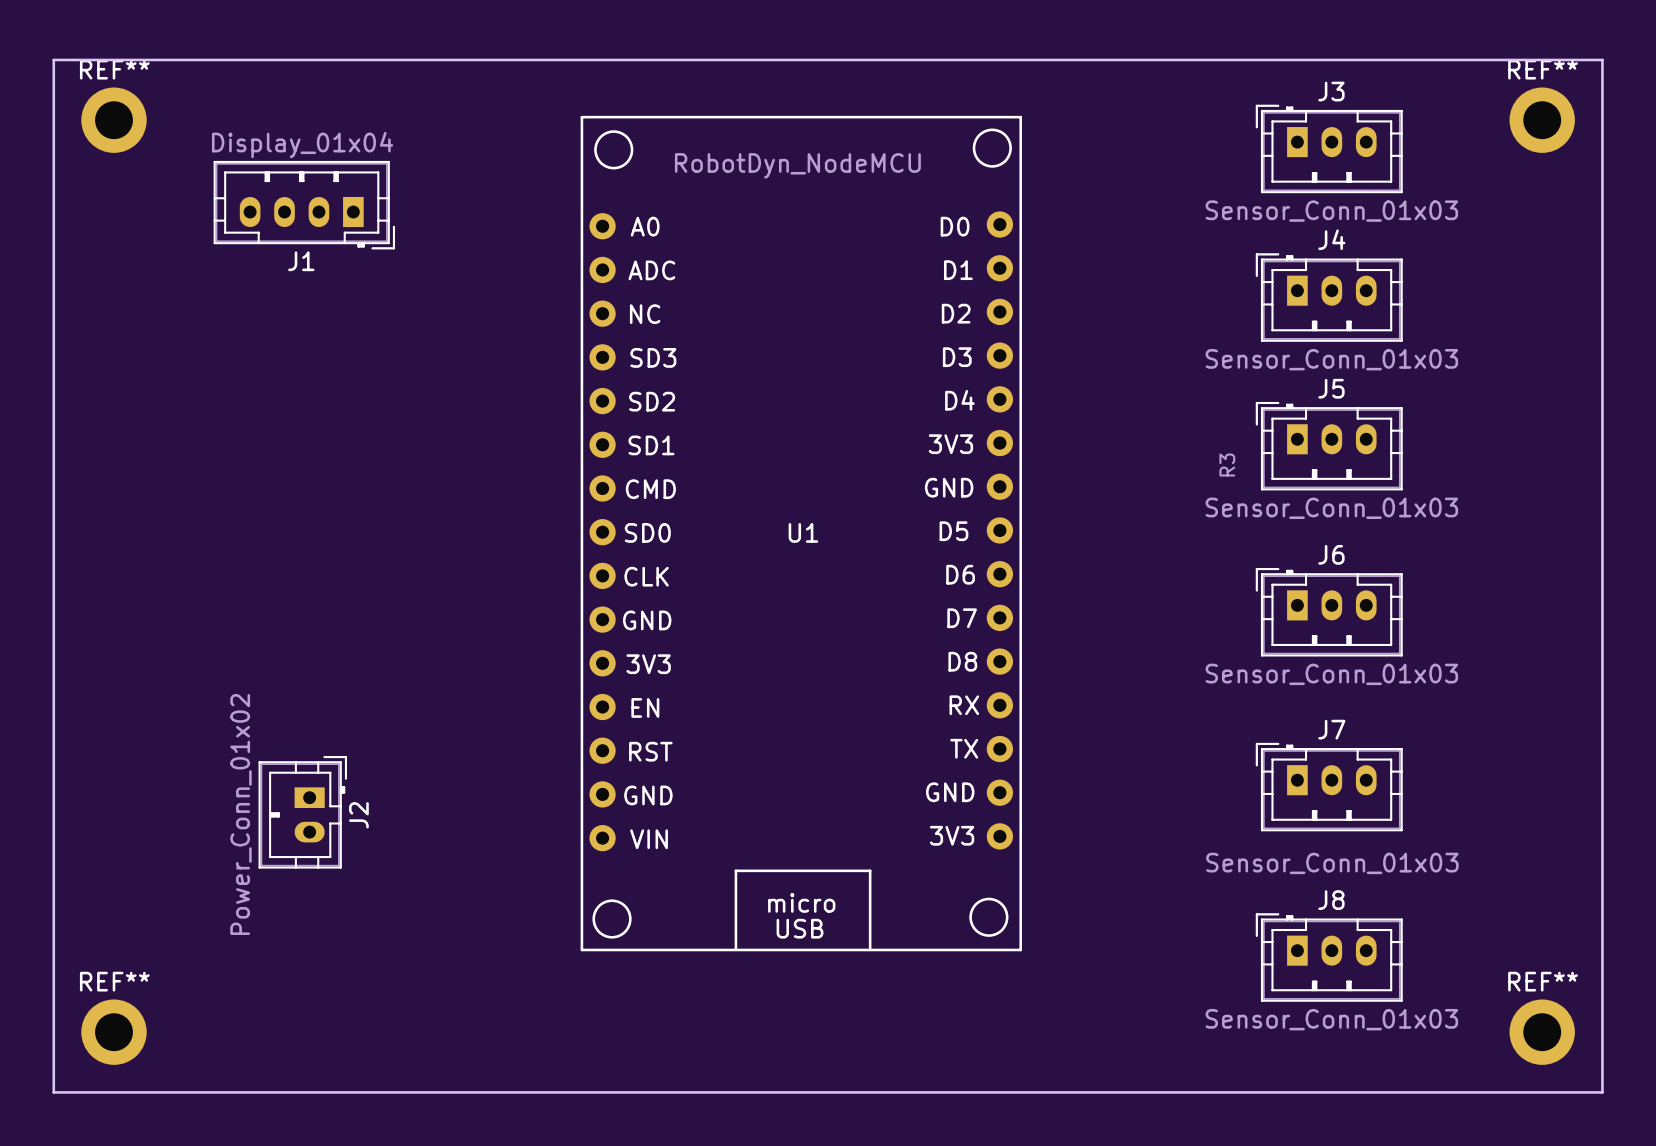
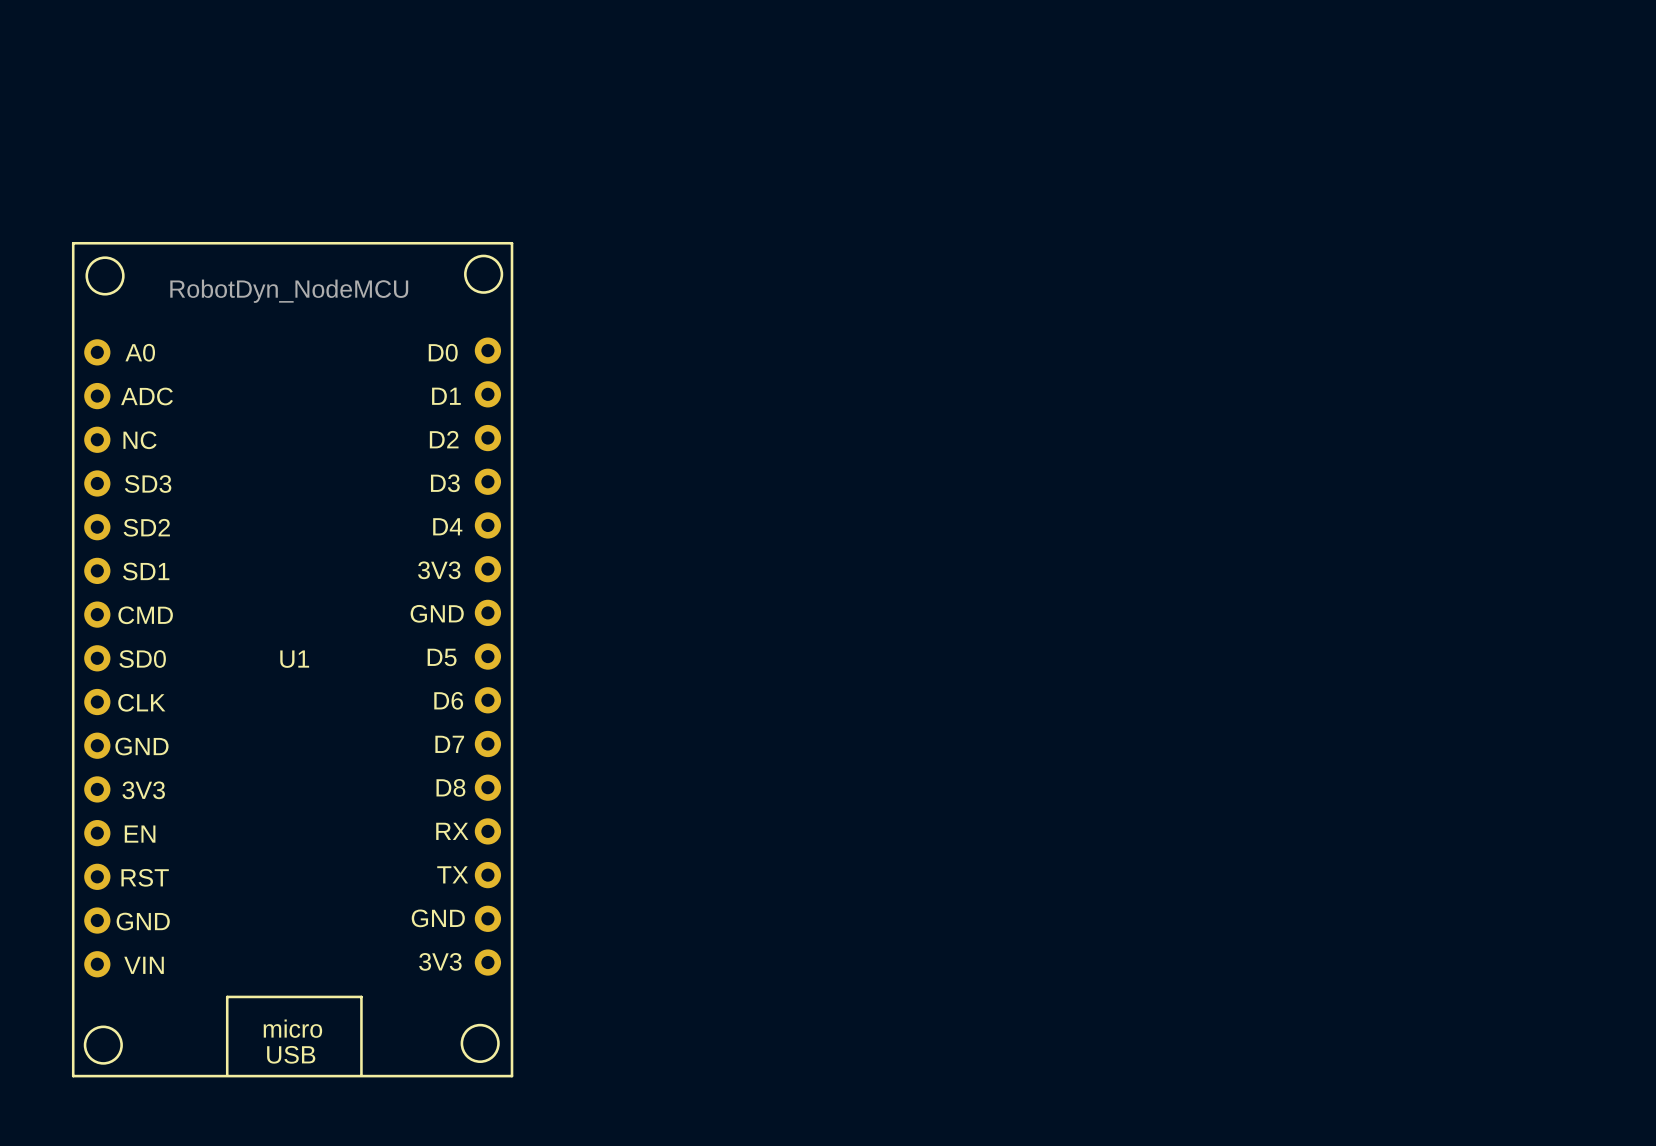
board edge: (53, 59) (53, 1092) (1602, 1092) (1602, 59) (53, 59) -> none
U1 footprint: [580, 115, 1023, 952] -> [71, 241, 514, 1078]
REF**: (114, 120) -> none
REF**: (1542, 120) -> none
J3: Sensor_Conn_01x03 (1329, 148) -> none
J1: Display_01x04 (304, 205) -> none
J4: Sensor_Conn_01x03 (1329, 297) -> none
J5: Sensor_Conn_01x03 (1329, 446) -> none
R3: (1227, 465) -> none
J6: Sensor_Conn_01x03 (1329, 612) -> none
J7: Sensor_Conn_01x03 (1329, 787) -> none
J2: Power_Conn_01x02 (302, 812) -> none
J8: Sensor_Conn_01x03 (1329, 957) -> none
REF**: (114, 1032) -> none
REF**: (1542, 1032) -> none

